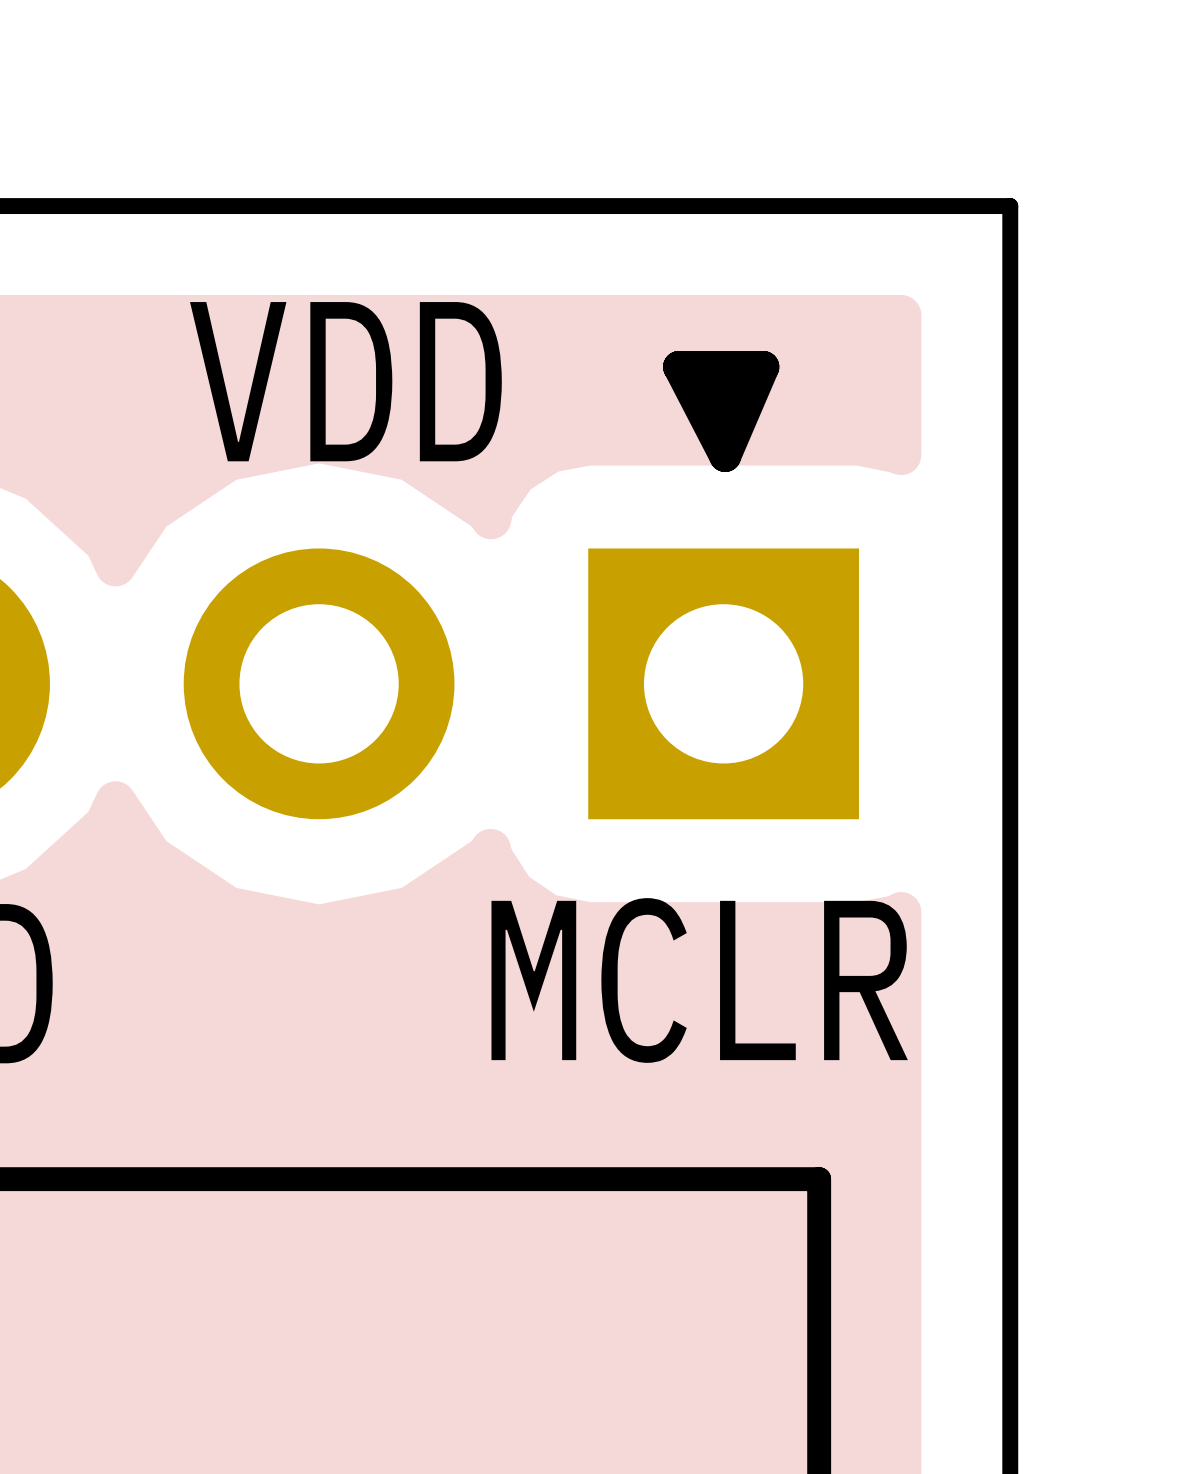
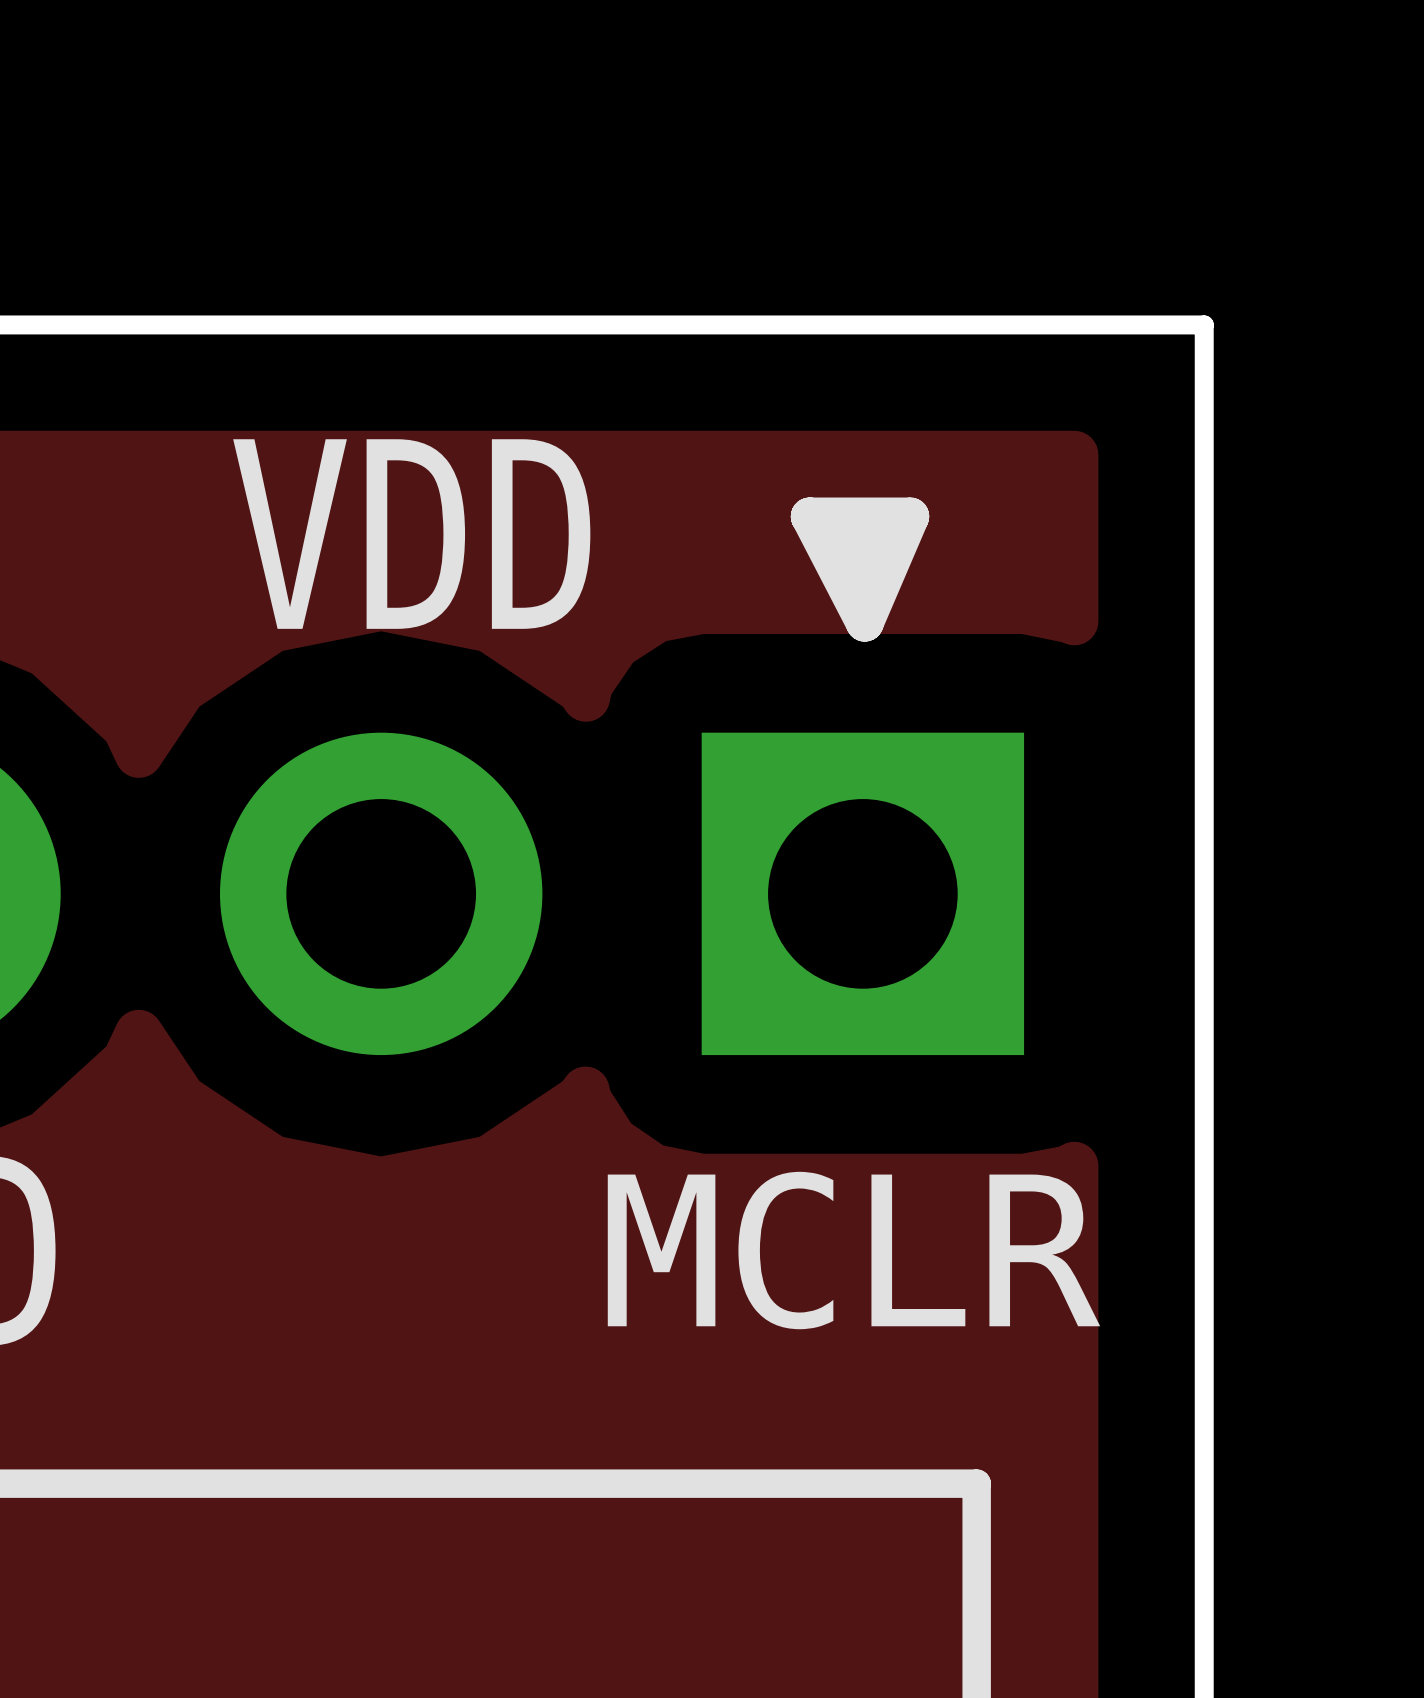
text position: MCLR (699, 980) -> MCLR (853, 1250)

